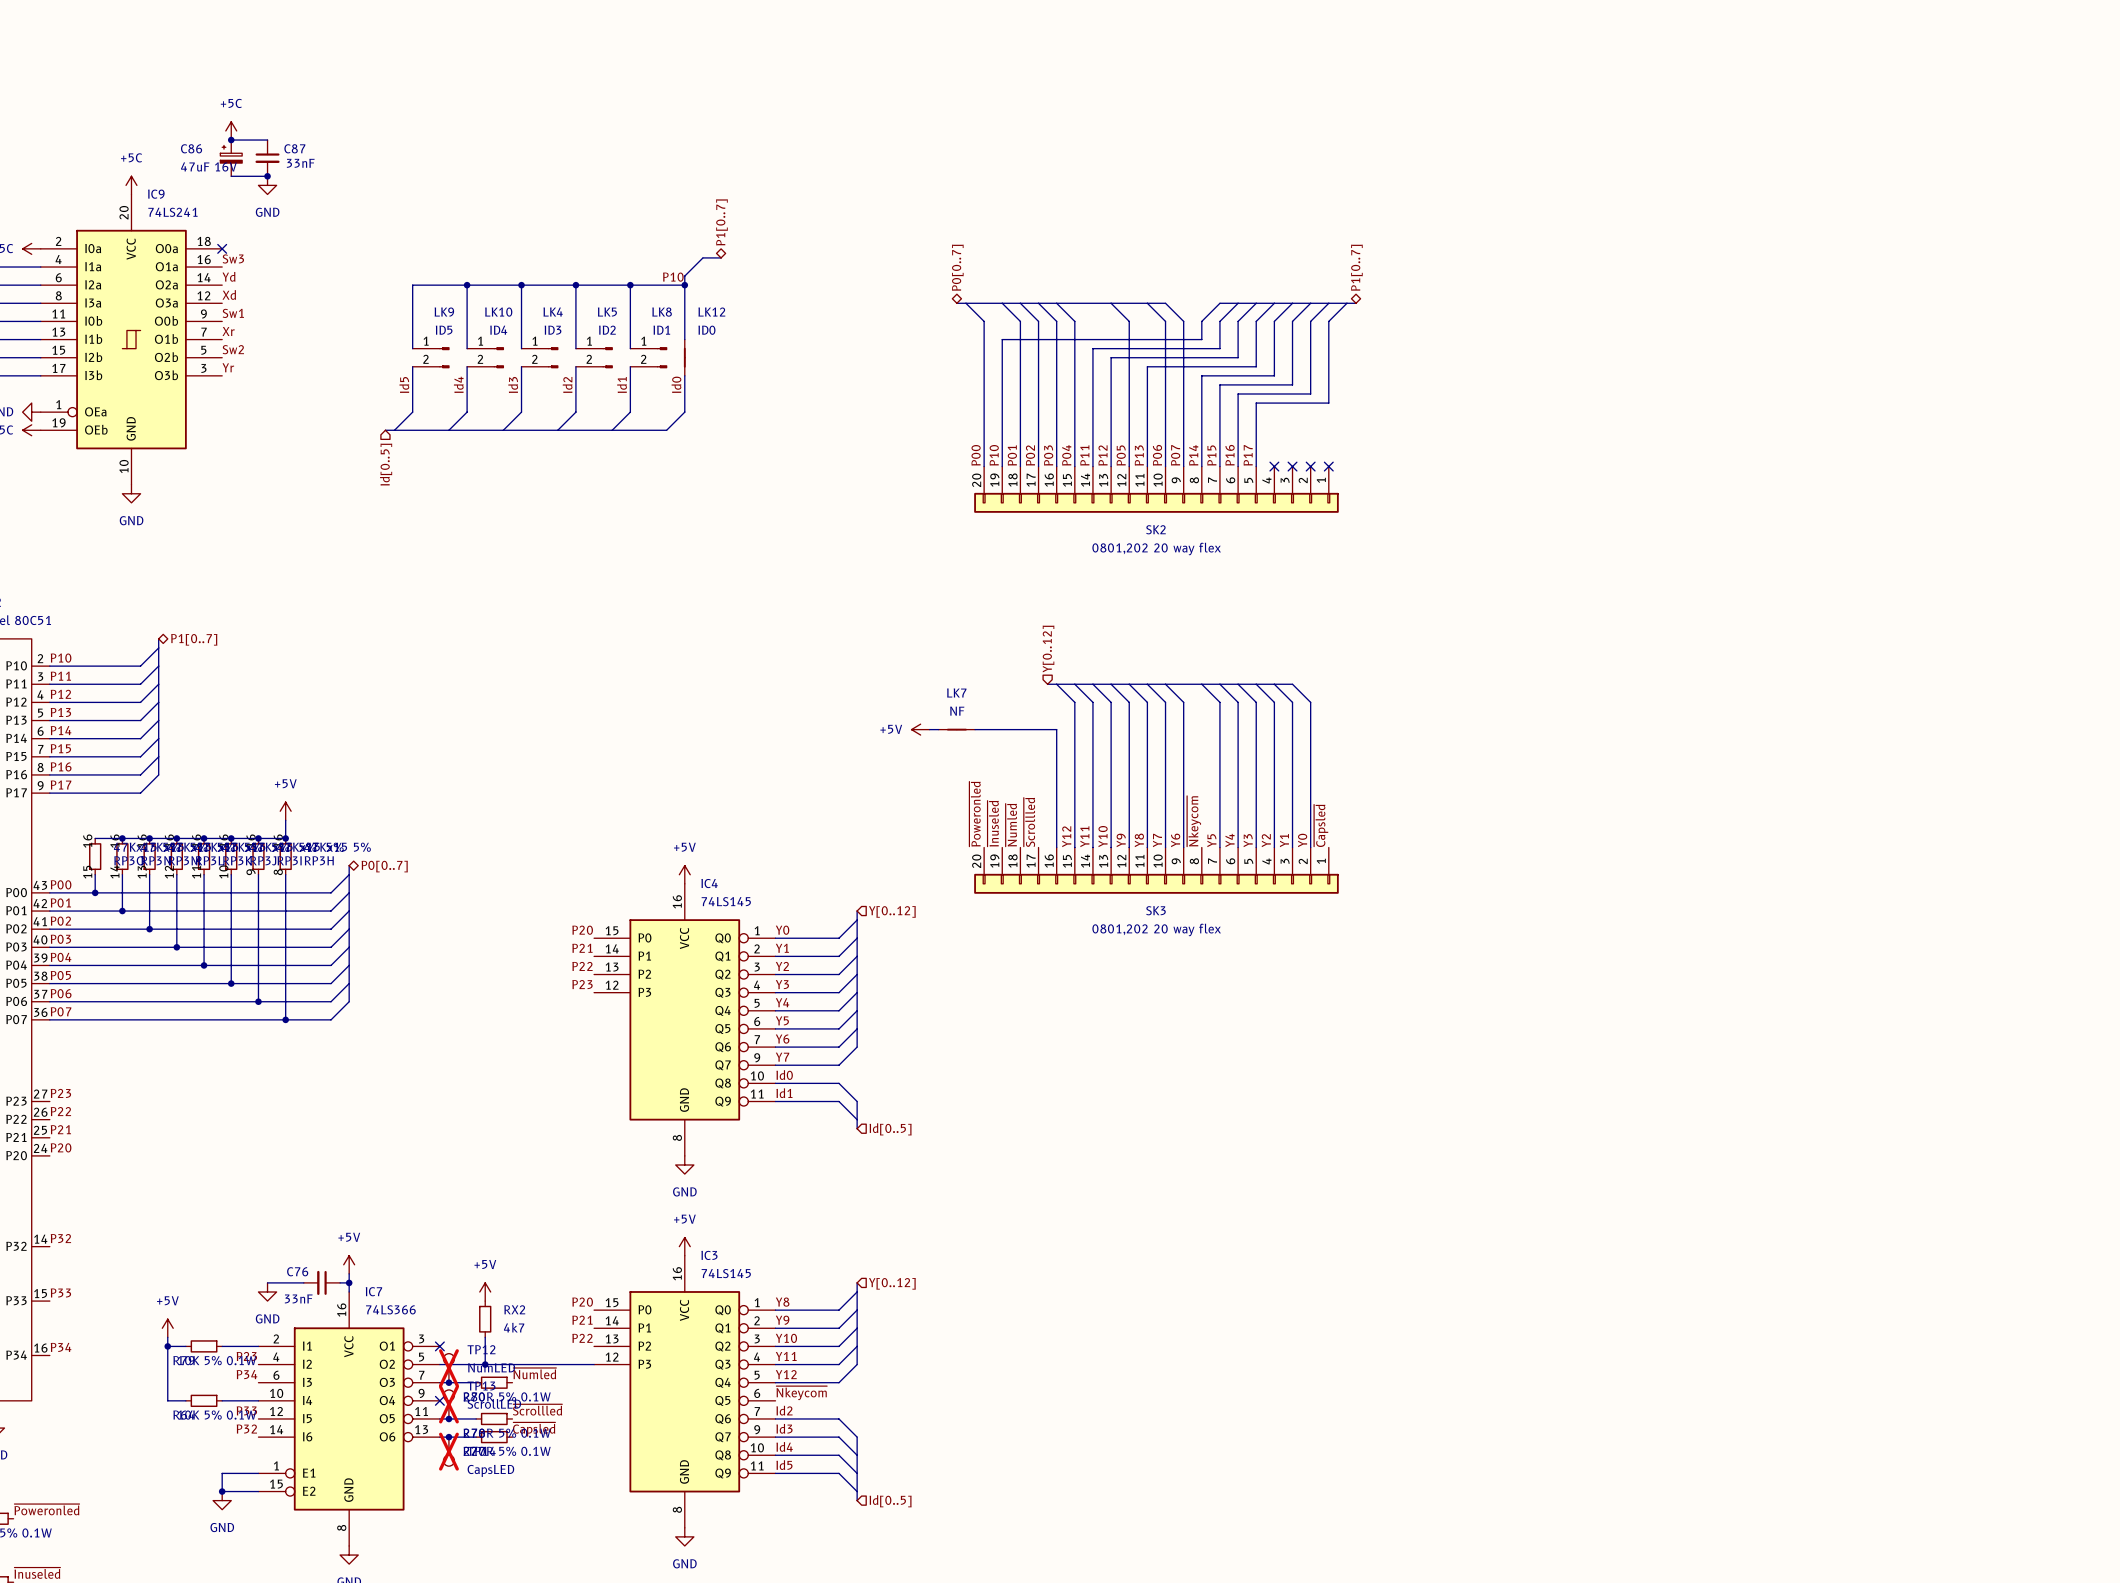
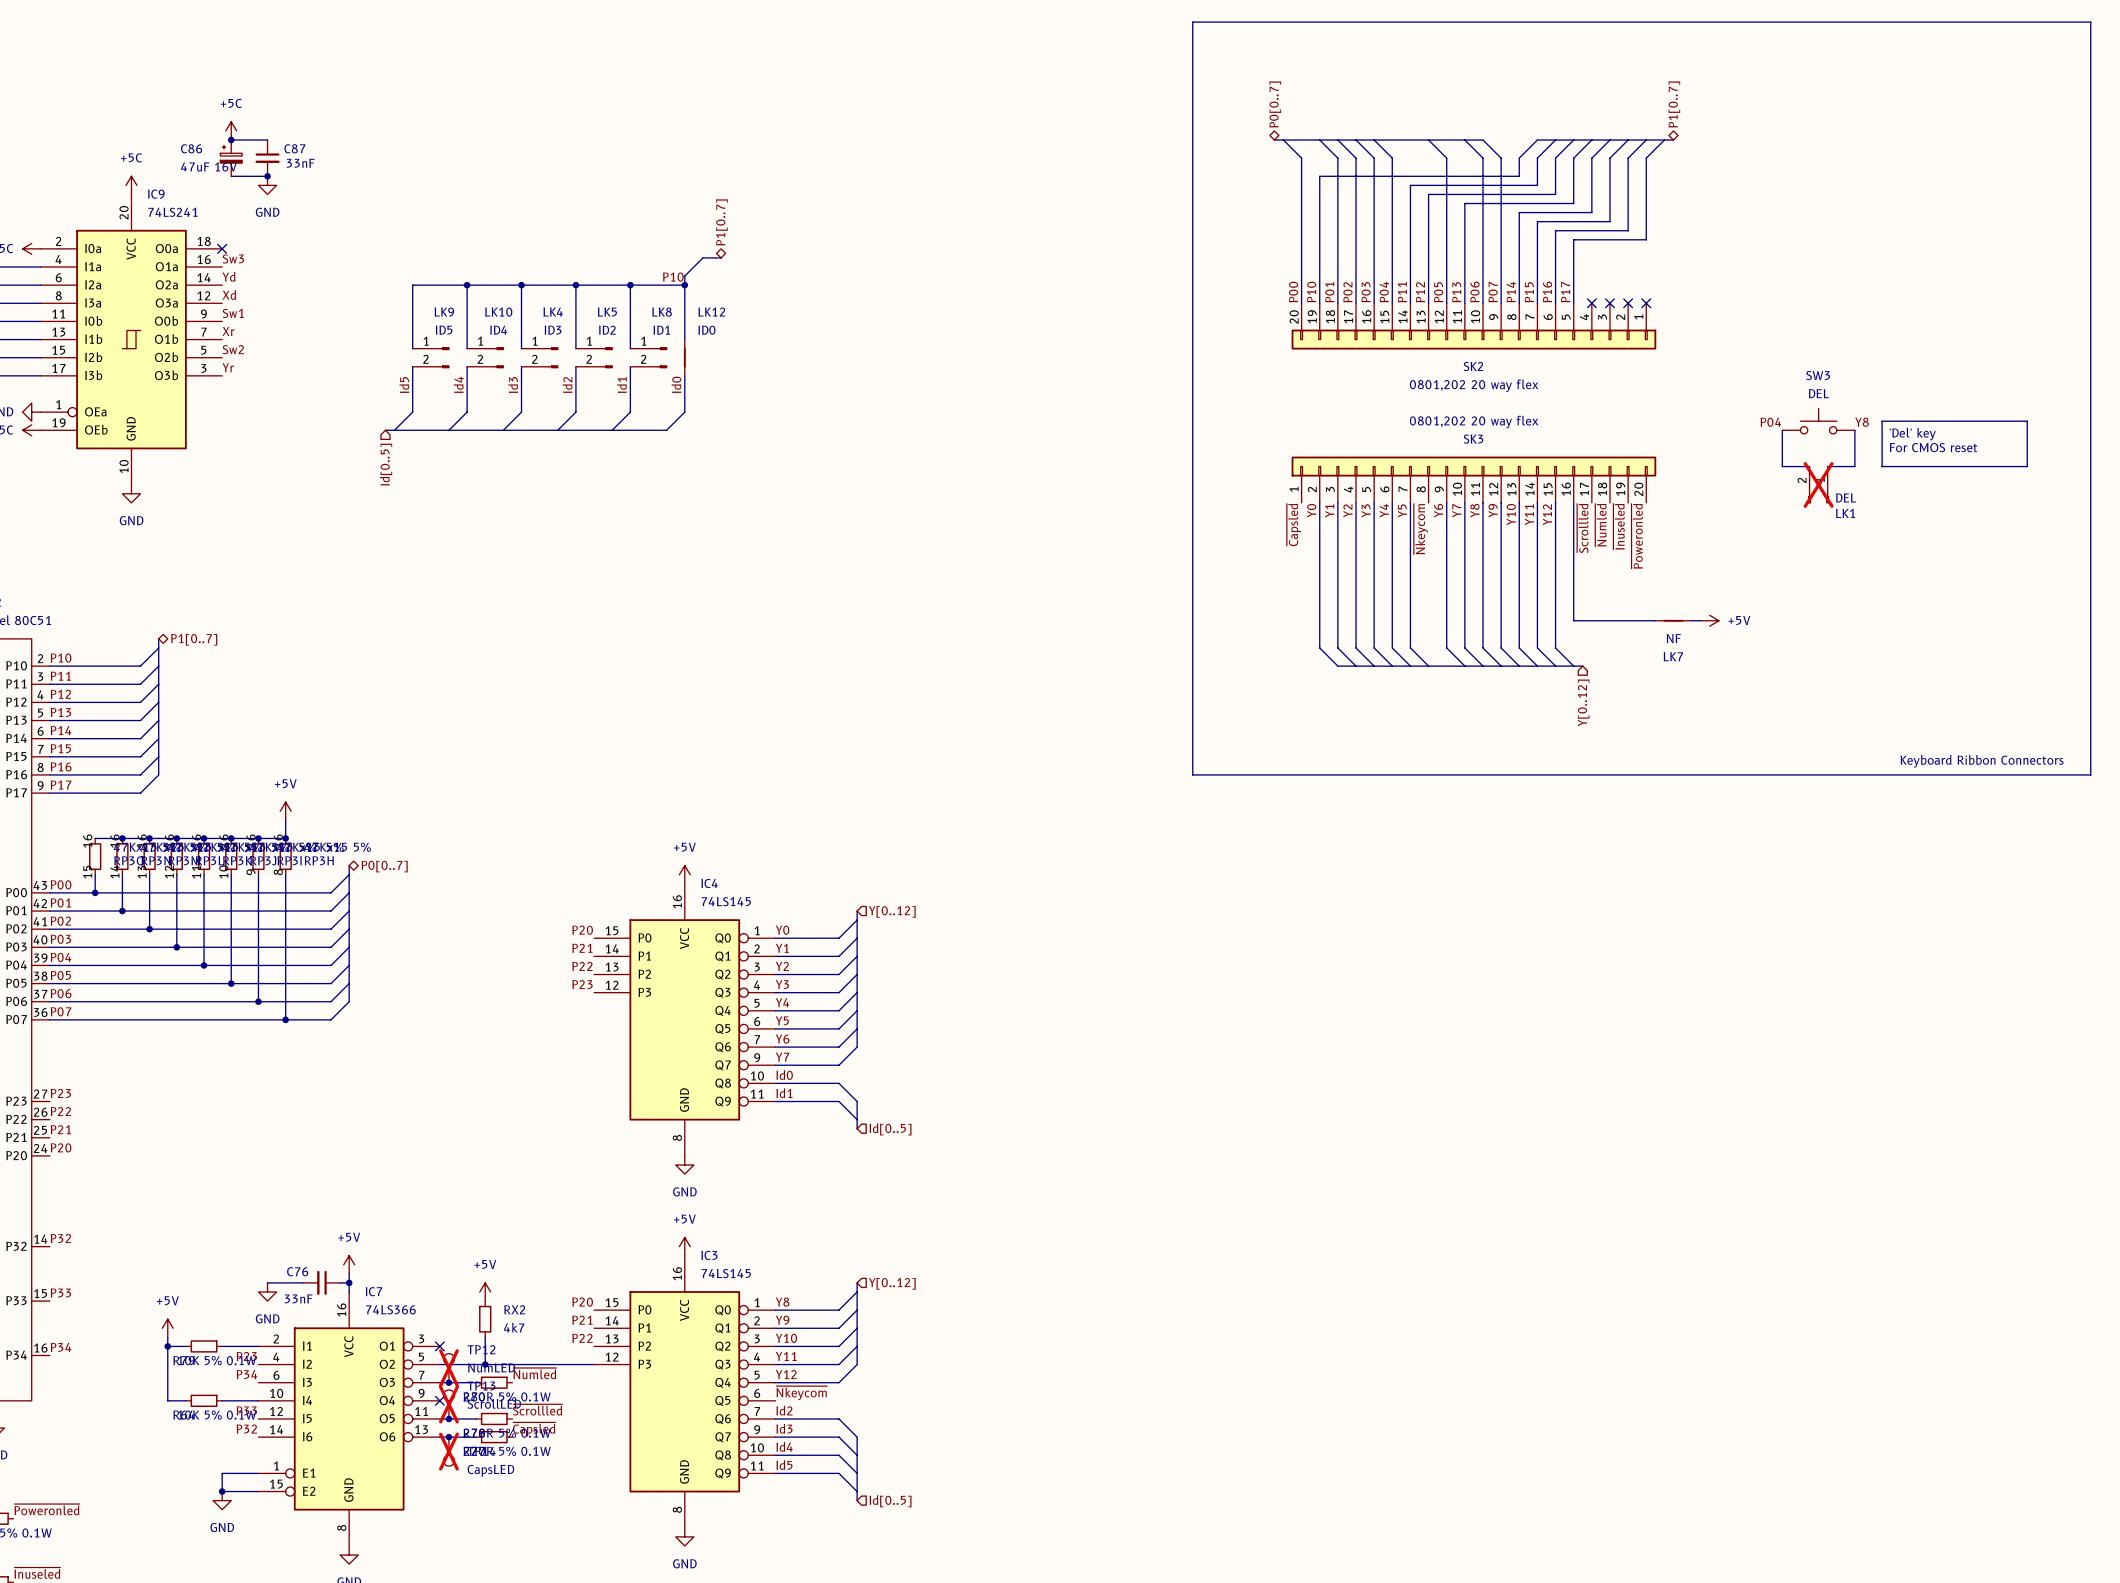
line: none -> (1192, 22) (2090, 22) (2090, 774) (1192, 774) (1192, 22)
hierarchical label: none -> P0[0..7] (1275, 104)
hierarchical label: none -> P1[0..7] (1674, 104)
bus: none -> (1274, 140) (1483, 140)
wire: none -> (1283, 140) (1301, 158) (1301, 303)
wire: none -> (1319, 140) (1337, 158) (1337, 303)
wire: none -> (1337, 140) (1356, 158) (1356, 303)
wire: none -> (1356, 140) (1374, 158) (1374, 303)
wire: none -> (1374, 140) (1392, 158) (1392, 303)
wire: none -> (1428, 140) (1446, 158) (1446, 303)
wire: none -> (1464, 140) (1483, 158) (1483, 303)
wire: none -> (1483, 140) (1501, 158) (1501, 303)
wire: none -> (1537, 140) (1519, 158) (1519, 176) (1319, 176) (1319, 303)
bus: none -> (1537, 140) (1673, 140)
wire: none -> (1555, 140) (1537, 158) (1537, 185) (1410, 185) (1410, 303)
wire: none -> (1573, 140) (1555, 158) (1555, 194) (1428, 194) (1428, 303)
wire: none -> (1591, 140) (1573, 158) (1573, 203) (1464, 203) (1464, 303)
wire: none -> (1609, 140) (1591, 158) (1591, 212) (1519, 212) (1519, 303)
wire: none -> (1628, 140) (1609, 158) (1609, 221) (1537, 221) (1537, 303)
wire: none -> (1646, 140) (1628, 158) (1628, 230) (1555, 230) (1555, 303)
wire: none -> (1664, 140) (1646, 158) (1646, 239) (1573, 239) (1573, 303)
hierarchical label: P0[0..7] (957, 267) -> none
hierarchical label: P1[0..7] (1356, 267) -> none
label: none -> P00 (1293, 292)
label: none -> P10 (1311, 292)
label: none -> P01 (1329, 292)
label: none -> P02 (1347, 292)
label: none -> P03 (1366, 292)
label: none -> P04 (1384, 292)
label: none -> P11 (1402, 292)
label: none -> P12 (1420, 292)
label: none -> P05 (1438, 292)
label: none -> P13 (1456, 292)
label: none -> P06 (1474, 292)
label: none -> P07 (1493, 292)
label: none -> P14 (1511, 292)
label: none -> P15 (1529, 292)
label: none -> P16 (1547, 292)
label: none -> P17 (1565, 292)
bus: (956, 303) (1165, 303) -> none
wire: (965, 303) (984, 321) (984, 466) -> none
wire: (1002, 303) (1020, 321) (1020, 466) -> none
wire: (1020, 303) (1038, 321) (1038, 466) -> none
wire: (1038, 303) (1056, 321) (1056, 466) -> none
wire: (1056, 303) (1074, 321) (1074, 466) -> none
wire: (1111, 303) (1129, 321) (1129, 466) -> none
wire: (1147, 303) (1165, 321) (1165, 466) -> none
wire: (1165, 303) (1183, 321) (1183, 466) -> none
wire: (1219, 303) (1201, 321) (1201, 339) (1002, 339) (1002, 466) -> none
bus: (1219, 303) (1356, 303) -> none
wire: (1238, 303) (1219, 321) (1219, 348) (1092, 348) (1092, 466) -> none
wire: (1256, 303) (1238, 321) (1238, 357) (1111, 357) (1111, 466) -> none
wire: (1274, 303) (1256, 321) (1256, 366) (1147, 366) (1147, 466) -> none
wire: (1292, 303) (1274, 321) (1274, 375) (1201, 375) (1201, 466) -> none
wire: (1310, 303) (1292, 321) (1292, 384) (1219, 384) (1219, 466) -> none
wire: (1328, 303) (1310, 321) (1310, 394) (1238, 394) (1238, 466) -> none
wire: (1346, 303) (1328, 321) (1328, 403) (1256, 403) (1256, 466) -> none
no-connect mark: none -> (1591, 303)
no-connect mark: none -> (1609, 303)
no-connect mark: none -> (1628, 303)
no-connect mark: none -> (1646, 303)
SW3: none -> DEL (1818, 421)
line: none -> (1882, 421) (2027, 421) (2027, 466) (1882, 466) (1882, 421)
label: none -> P04 (1770, 422)
label: none -> Y8 (1862, 422)
wire: none -> (1782, 430) (1782, 466) (1809, 466)
wire: none -> (1854, 430) (1854, 466) (1827, 466)
text: none -> 'Del' key (1912, 434)
text: none -> For CMOS reset (1933, 447)
label: P00 (976, 455) -> none
label: P10 (994, 455) -> none
label: P01 (1012, 455) -> none
label: P02 (1030, 455) -> none
label: P03 (1048, 455) -> none
label: P04 (1066, 455) -> none
label: P11 (1084, 455) -> none
label: P12 (1103, 455) -> none
label: P05 (1121, 455) -> none
label: P13 (1139, 455) -> none
label: P06 (1157, 455) -> none
label: P07 (1175, 455) -> none
label: P14 (1193, 455) -> none
label: P15 (1211, 455) -> none
label: P16 (1230, 455) -> none
label: P17 (1248, 455) -> none
no-connect mark: (1274, 466) -> none
no-connect mark: (1292, 466) -> none
no-connect mark: (1310, 466) -> none
no-connect mark: (1328, 466) -> none
LK1: none -> DEL (1818, 484)
SK2 position: (1156, 489) -> (1473, 326)
wire: none -> (1319, 502) (1319, 647) (1337, 666)
wire: none -> (1337, 502) (1337, 647) (1356, 666)
wire: none -> (1356, 502) (1356, 647) (1374, 666)
wire: none -> (1374, 502) (1374, 647) (1392, 666)
wire: none -> (1392, 502) (1392, 647) (1410, 666)
wire: none -> (1410, 502) (1410, 647) (1428, 666)
wire: none -> (1446, 502) (1446, 647) (1464, 666)
wire: none -> (1464, 502) (1464, 647) (1483, 666)
wire: none -> (1482, 502) (1483, 647) (1501, 666)
wire: none -> (1501, 502) (1501, 647) (1519, 666)
wire: none -> (1519, 502) (1519, 647) (1537, 666)
wire: none -> (1537, 502) (1537, 647) (1555, 666)
wire: none -> (1555, 502) (1555, 647) (1573, 666)
wire: none -> (1573, 502) (1573, 620) (1655, 620)
label: none -> Y0 (1311, 510)
label: none -> Y1 (1329, 510)
label: none -> Y2 (1347, 510)
label: none -> Y3 (1366, 510)
label: none -> Y4 (1384, 510)
label: none -> Y5 (1402, 510)
label: none -> Y6 (1438, 510)
label: none -> Y7 (1456, 510)
label: none -> Y8 (1474, 510)
label: none -> Y9 (1493, 510)
label: none -> Y10 (1511, 514)
label: none -> Y11 (1529, 514)
label: none -> Y12 (1547, 514)
label: none -> ~{Capsled} (1293, 524)
label: none -> ~{Numled} (1600, 525)
label: none -> ~{Inuseled} (1619, 526)
label: none -> ~{Scrollled} (1582, 528)
label: none -> ~{Nkeycom} (1420, 529)
label: none -> ~{Poweronled} (1637, 536)
wire: none -> (1691, 620) (1700, 620)
power symbol: none -> +5V (1709, 620)
hierarchical label: Y[0..12] (1048, 648) -> none
bus: none -> (1337, 666) (1582, 666)
bus: (1047, 684) (1292, 684) -> none
wire: (1056, 684) (1074, 702) (1074, 847) -> none
wire: (1074, 684) (1092, 702) (1092, 847) -> none
wire: (1092, 684) (1111, 702) (1111, 847) -> none
wire: (1111, 684) (1129, 702) (1129, 847) -> none
wire: (1129, 684) (1147, 702) (1147, 847) -> none
wire: (1147, 684) (1165, 702) (1165, 847) -> none
wire: (1165, 684) (1183, 702) (1183, 847) -> none
wire: (1201, 684) (1219, 702) (1219, 847) -> none
wire: (1219, 684) (1238, 702) (1238, 847) -> none
wire: (1238, 684) (1256, 702) (1256, 847) -> none
wire: (1256, 684) (1274, 702) (1274, 847) -> none
wire: (1274, 684) (1292, 702) (1292, 847) -> none
wire: (1292, 684) (1310, 702) (1310, 847) -> none
LK7 name position: LK7 (956, 692) -> LK7 (1673, 656)
hierarchical label: none -> Y[0..12] (1583, 702)
LK7 value position: NF (957, 711) -> NF (1673, 638)
power symbol: +5V (920, 729) -> none
wire: (929, 729) (938, 729) -> none
LK7 position: (956, 729) -> (1673, 620)
wire: (975, 729) (1056, 729) (1056, 847) -> none
text: none -> Keyboard Ribbon Connectors (1982, 761)
label: ~{Poweronled} (975, 814) -> none
label: ~{Nkeycom} (1194, 821) -> none
label: ~{Scrollled} (1029, 822) -> none
label: ~{Inuseled} (993, 823) -> none
label: ~{Numled} (1011, 825) -> none
label: ~{Capsled} (1321, 825) -> none
label: Y12 (1066, 836) -> none
label: Y11 (1084, 836) -> none
label: Y10 (1103, 836) -> none
label: Y9 (1121, 840) -> none
label: Y8 (1139, 840) -> none
label: Y7 (1157, 840) -> none
label: Y6 (1175, 840) -> none
label: Y5 (1211, 840) -> none
label: Y4 (1230, 840) -> none
label: Y3 (1248, 840) -> none
label: Y2 (1266, 840) -> none
label: Y1 (1284, 840) -> none
label: Y0 (1302, 840) -> none
SK3 position: (1156, 870) -> (1473, 479)
SK3 rotation: 0° (1156, 883) -> 180° (1473, 466)

